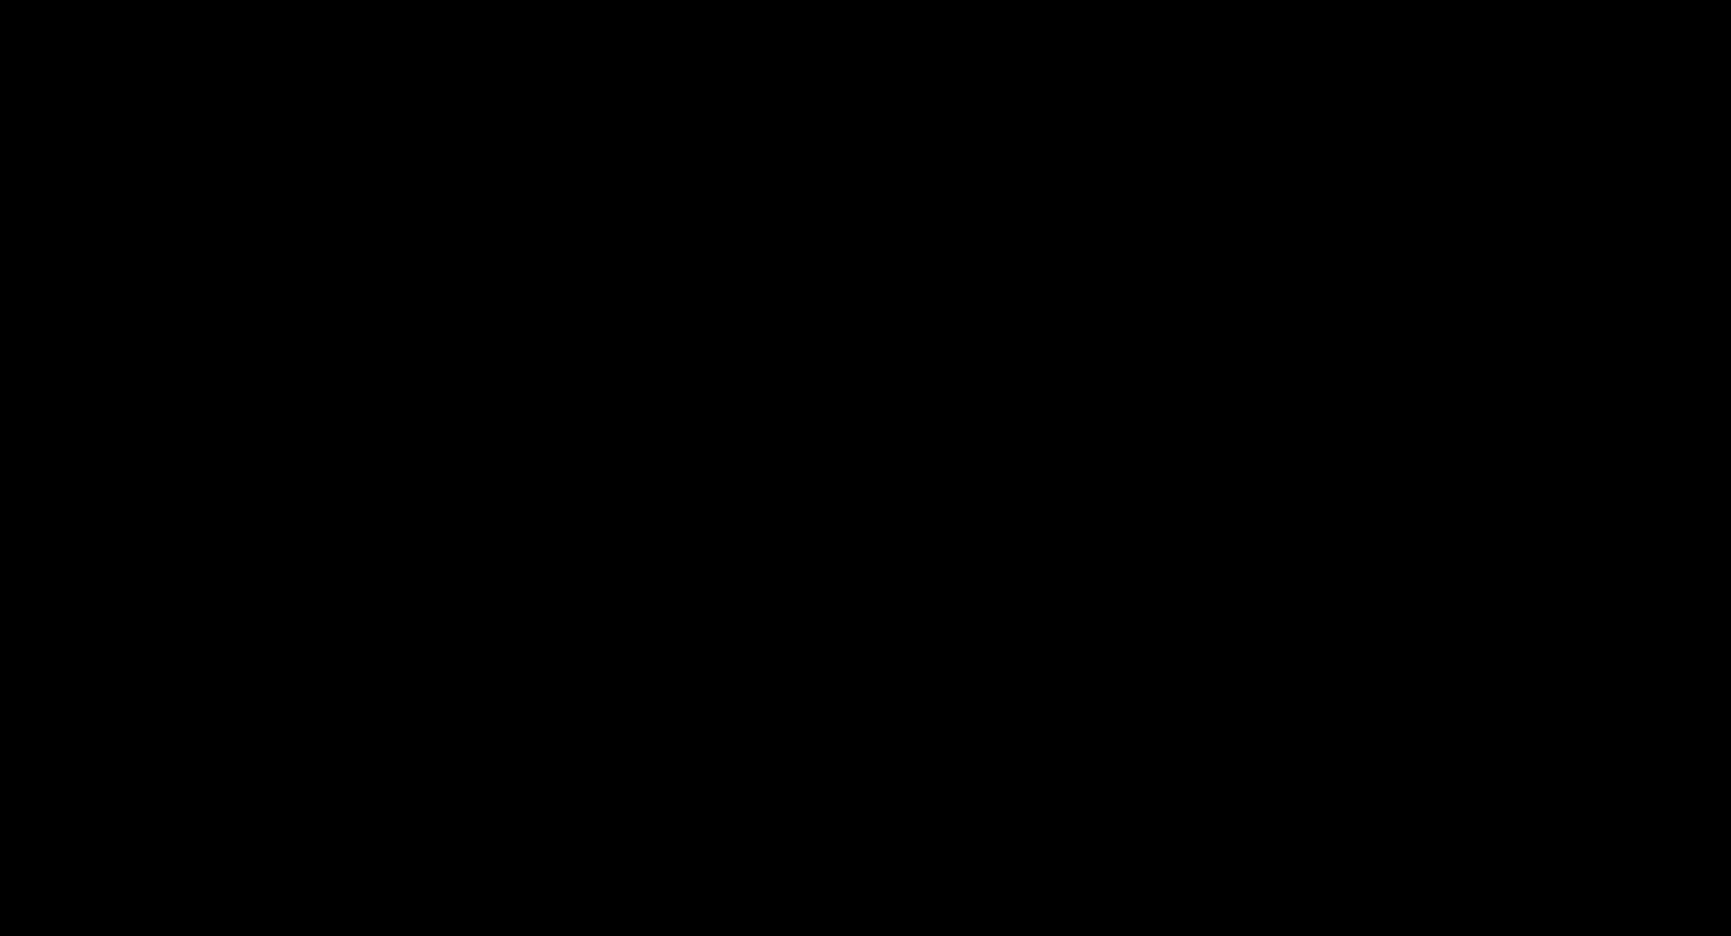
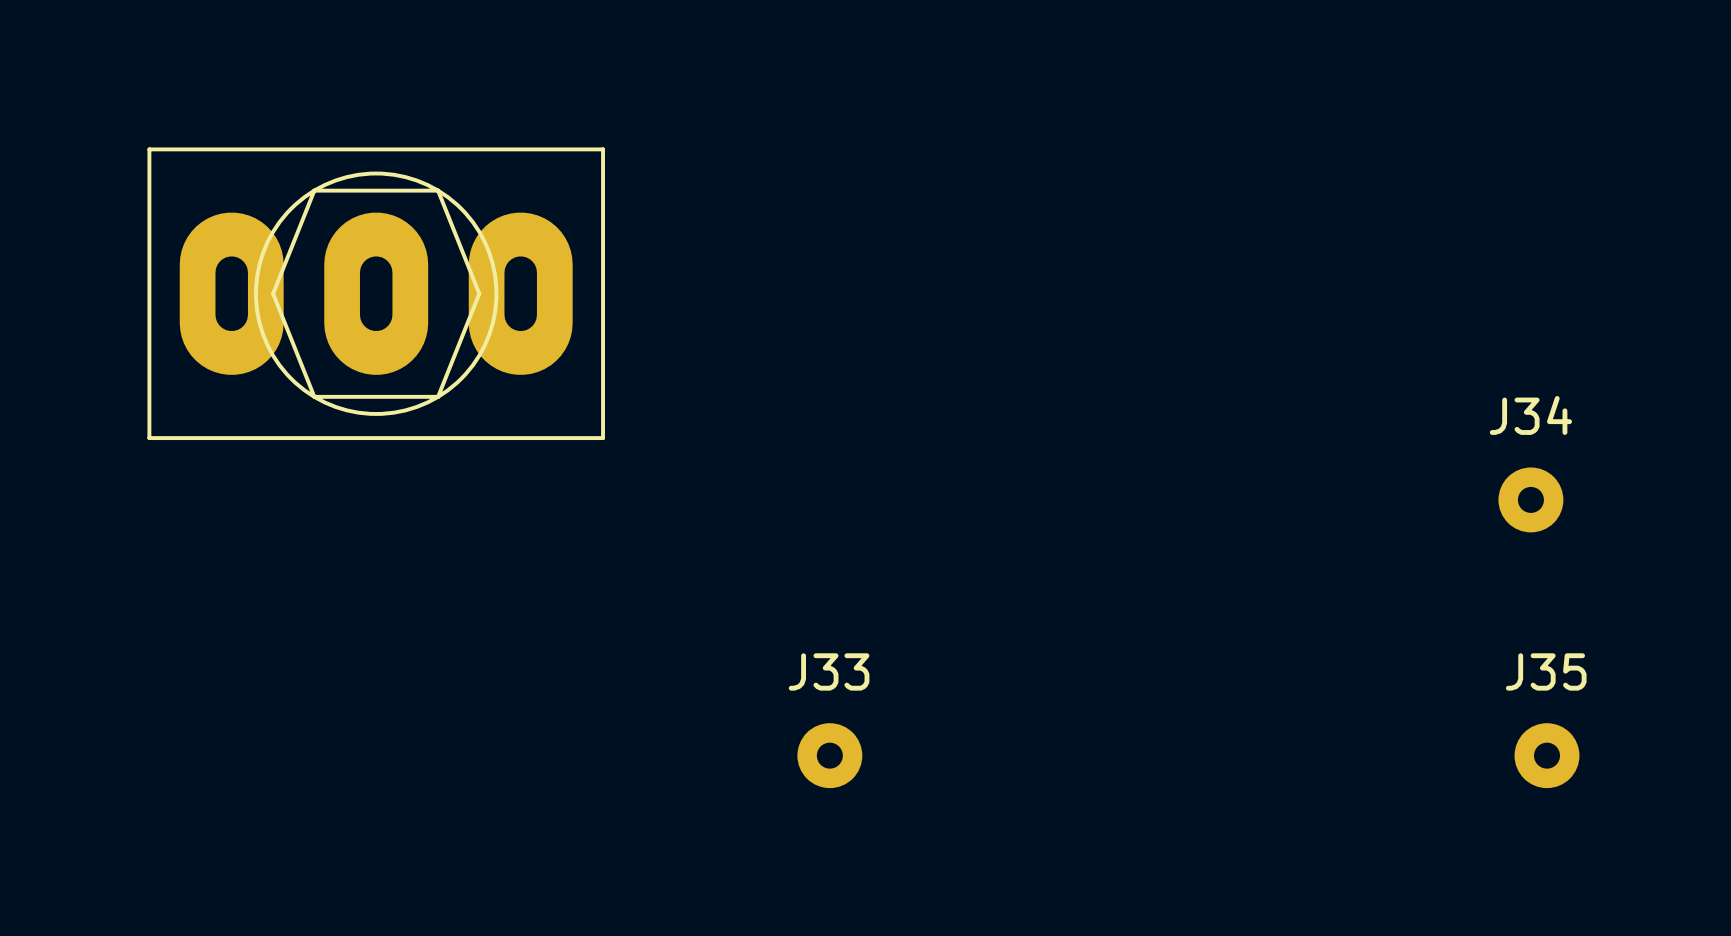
part: none -> (376, 293)
J34: none -> (1530, 499)
J33: none -> (829, 755)
J35: none -> (1547, 755)

